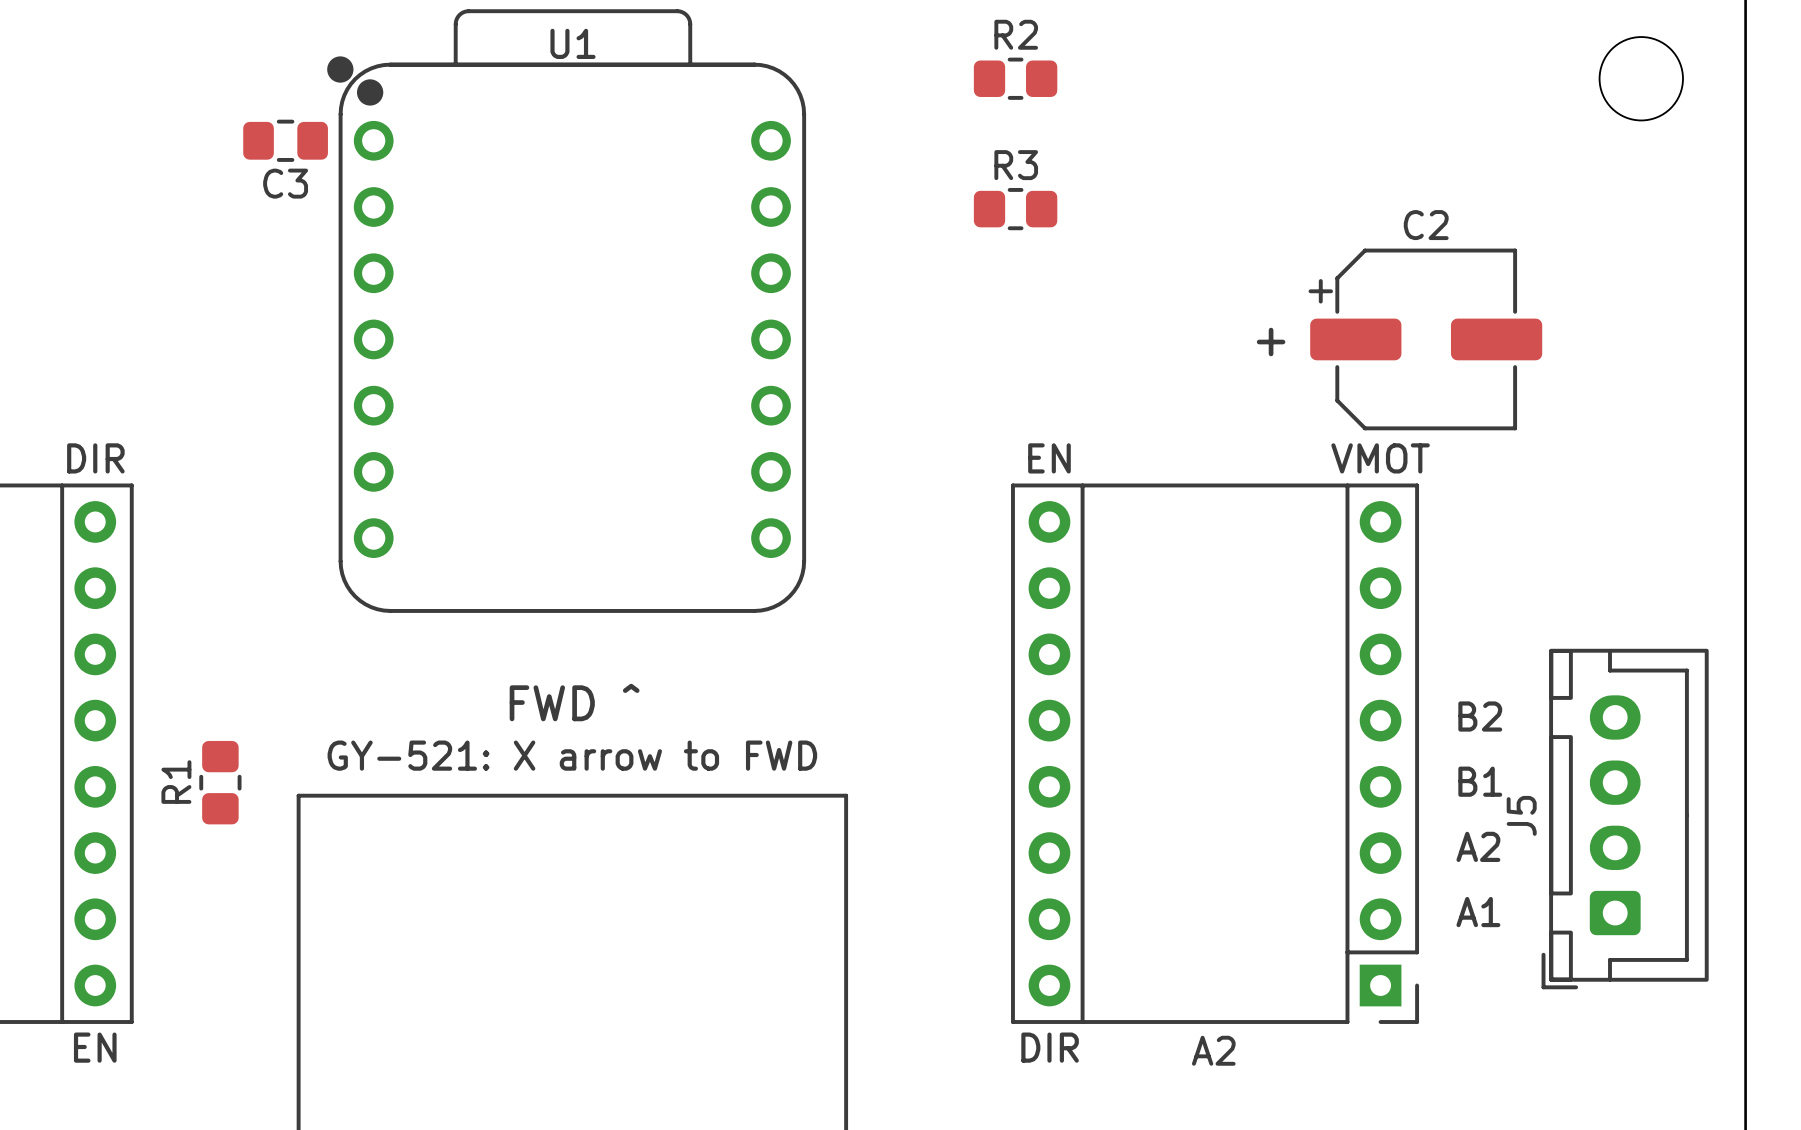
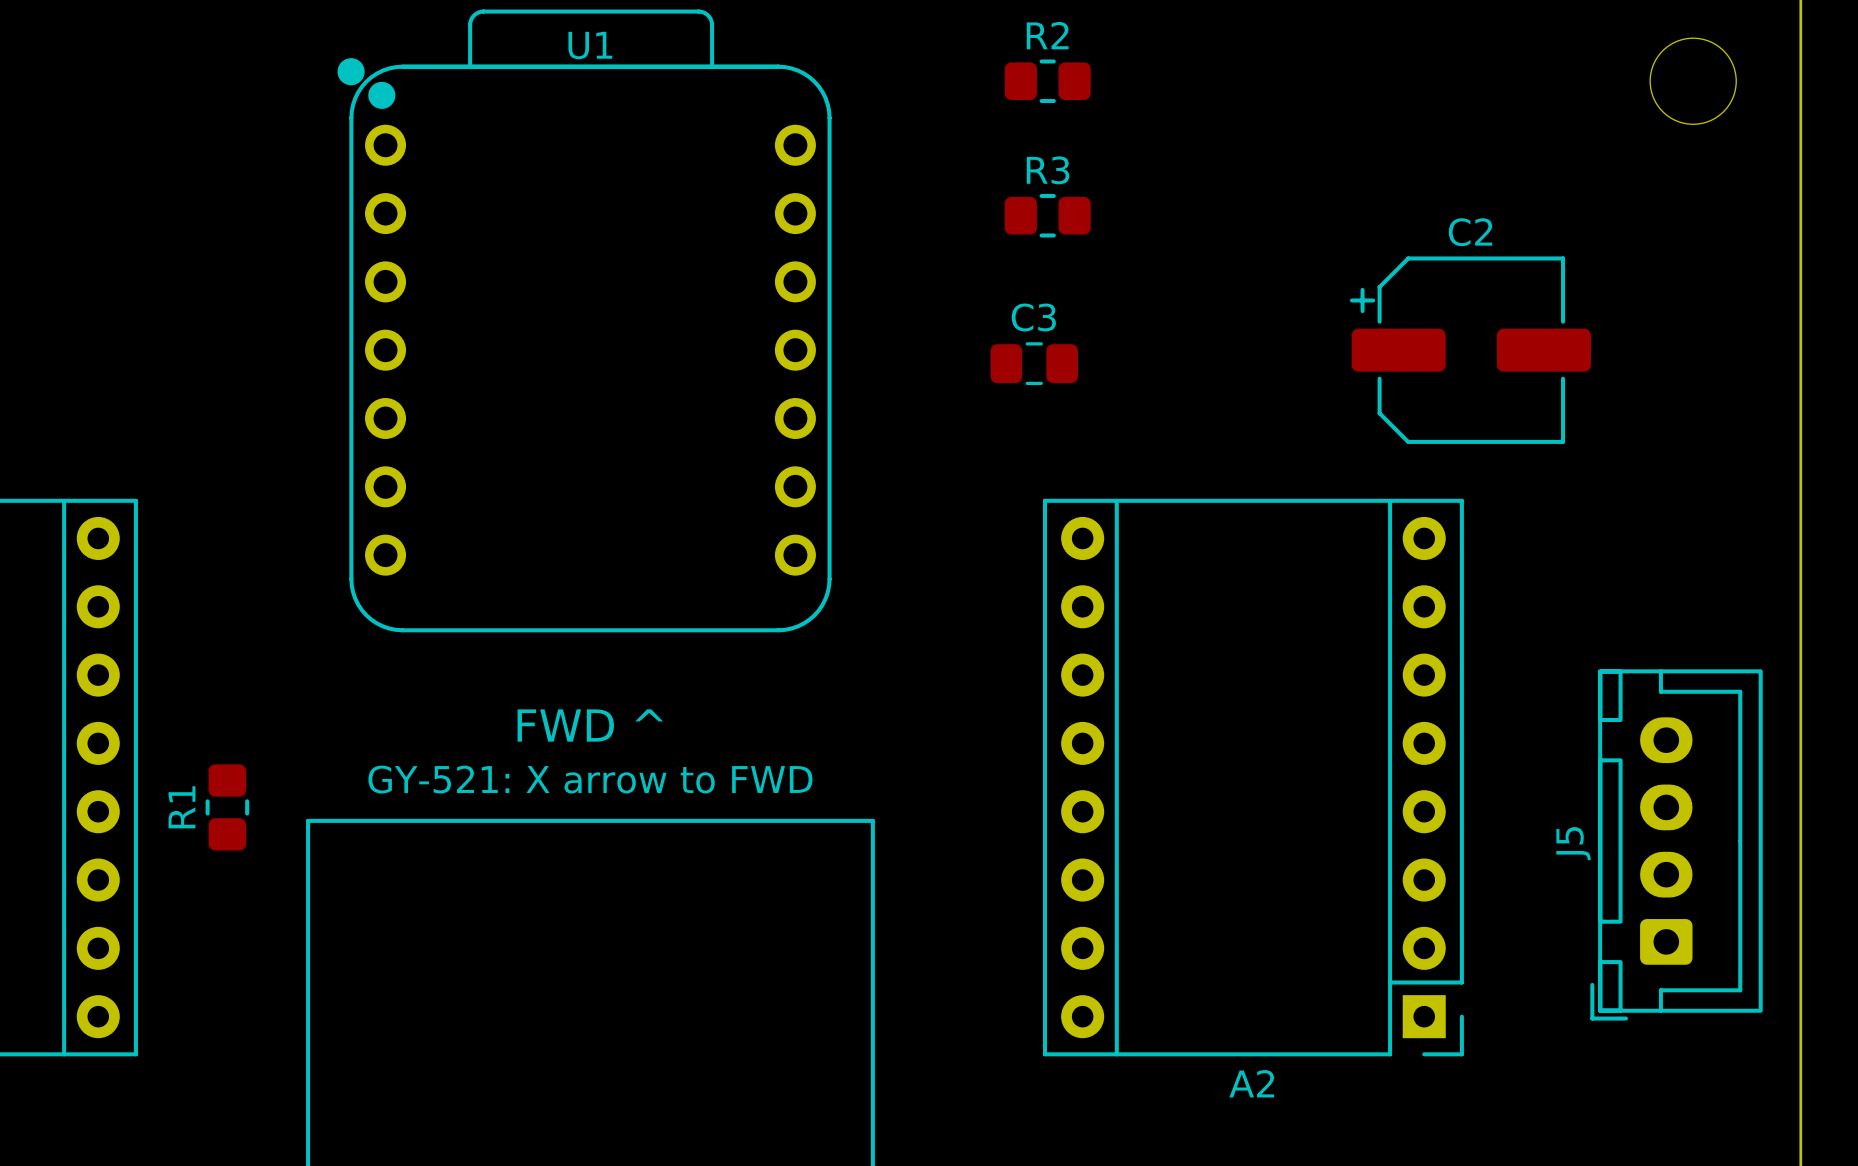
C3 footprint: [243, 119, 328, 162] -> [990, 342, 1078, 386]
C3 name position: C3 (285, 183) -> C3 (1033, 317)
text: + (1271, 342) -> none
text: DIR (95, 458) -> none
text: EN (1049, 458) -> none
text: VMOT (1380, 458) -> none
text: B2 (1480, 716) -> none
text: B1 (1480, 781) -> none
text: A2 (1478, 846) -> none
text: A1 (1478, 912) -> none
text: EN (95, 1047) -> none
text: DIR (1050, 1047) -> none

